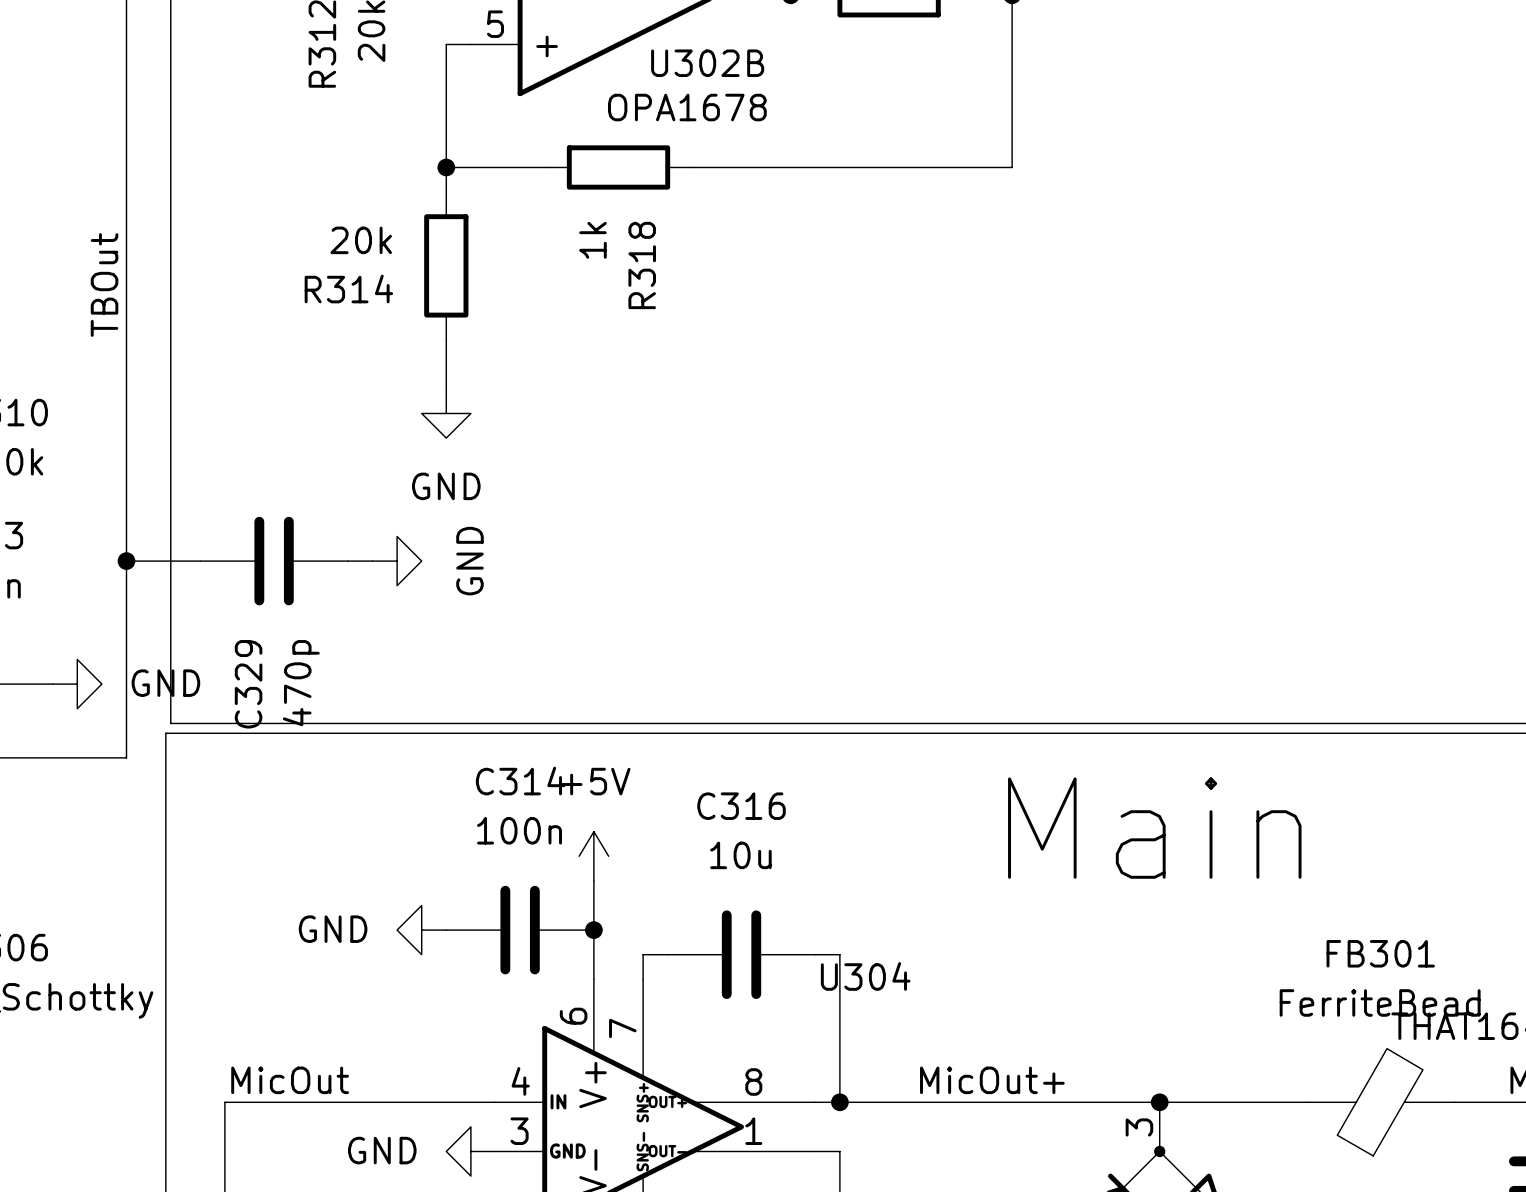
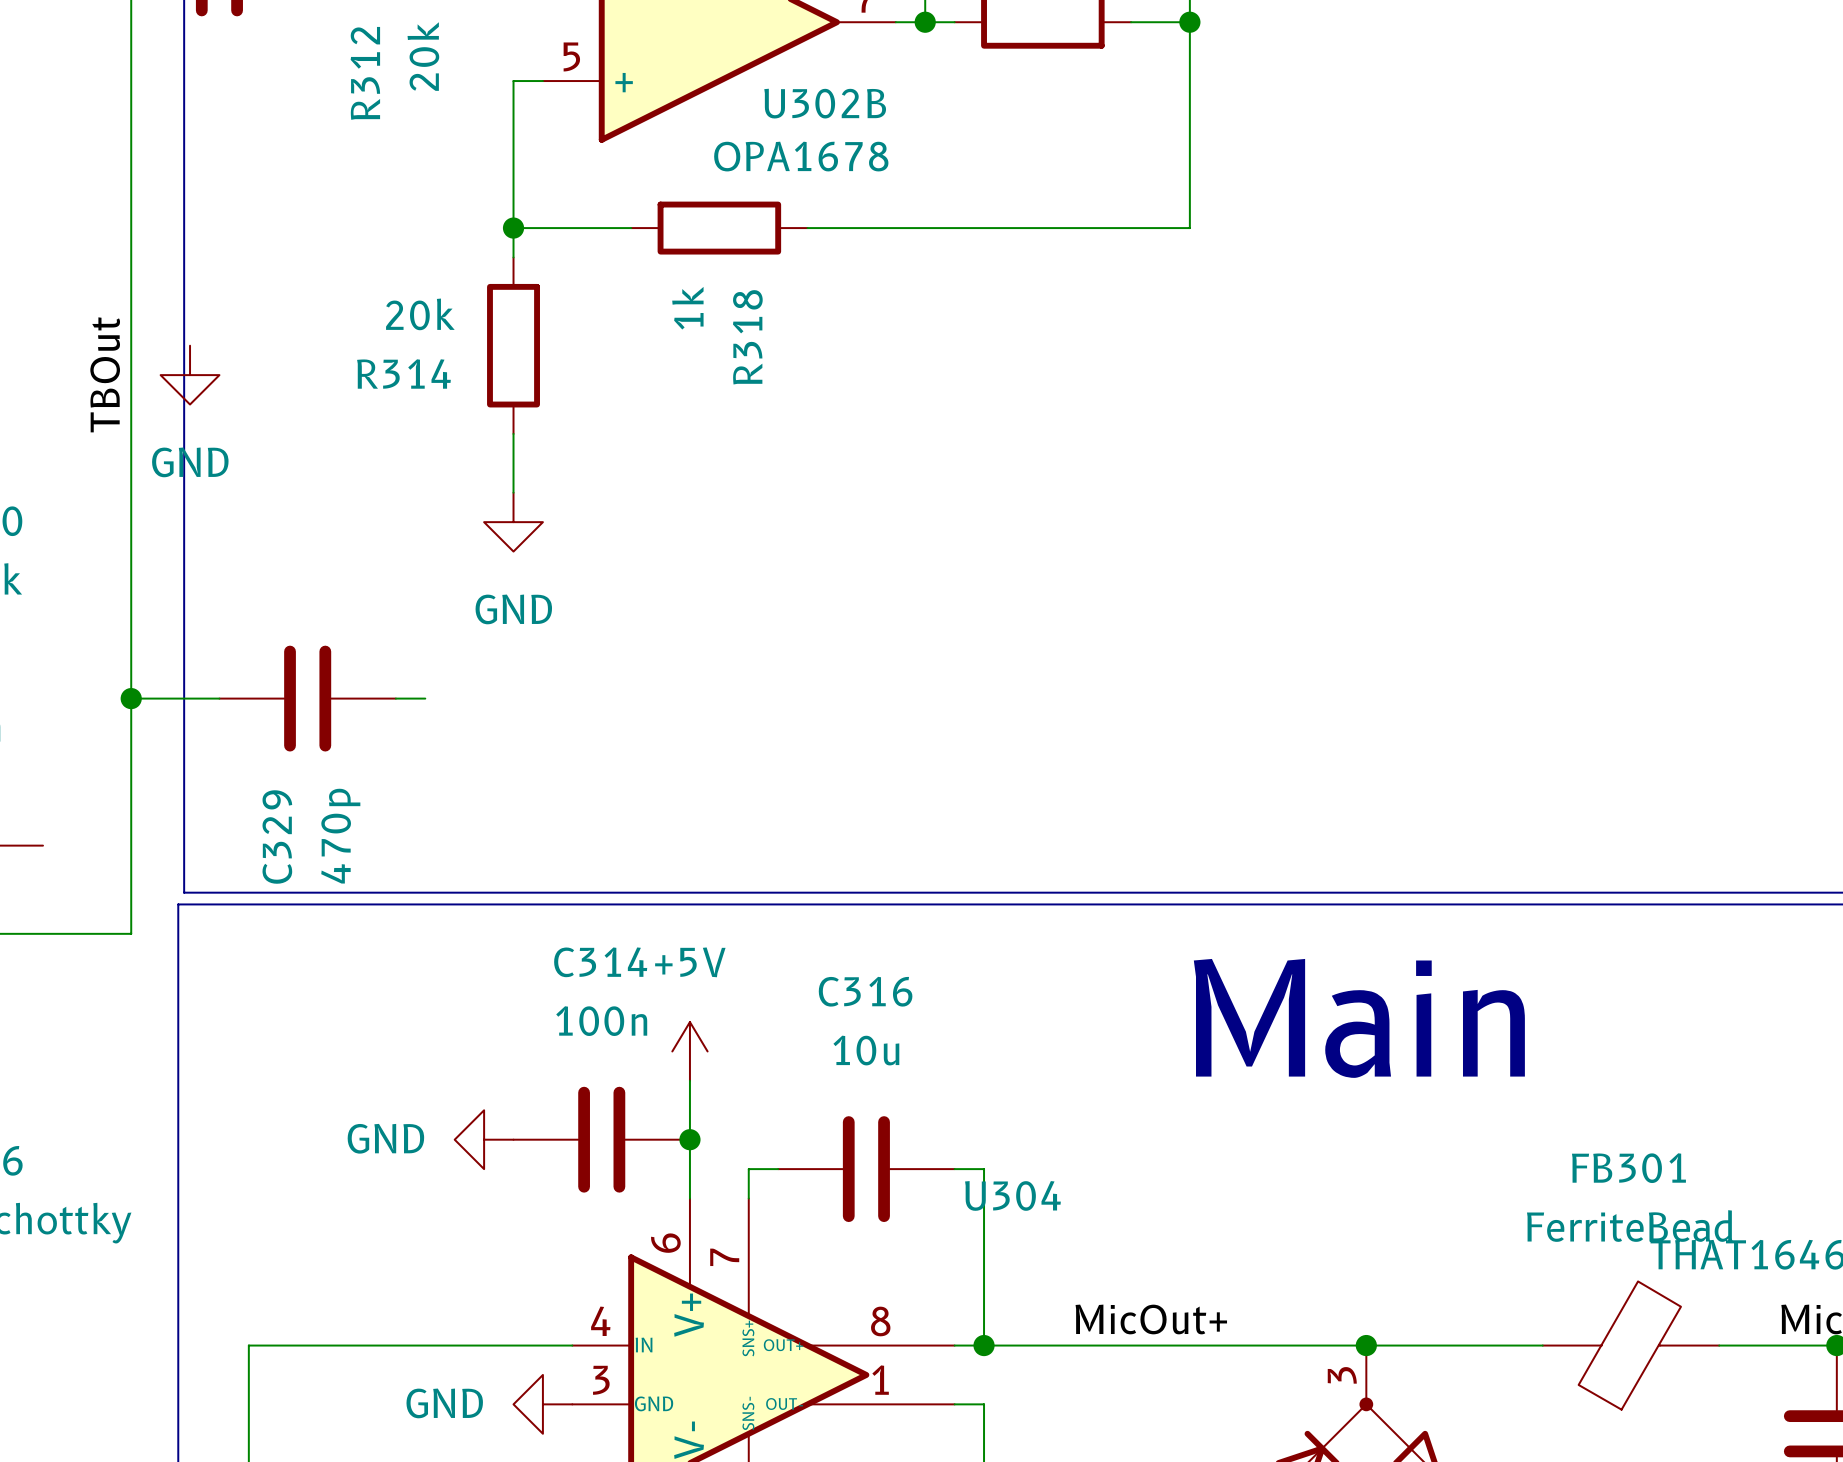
power symbol: none -> GND (190, 375)
power symbol: GND (397, 561) -> none
power symbol: GND (77, 684) -> none
label: MicOut (290, 1080) -> none

